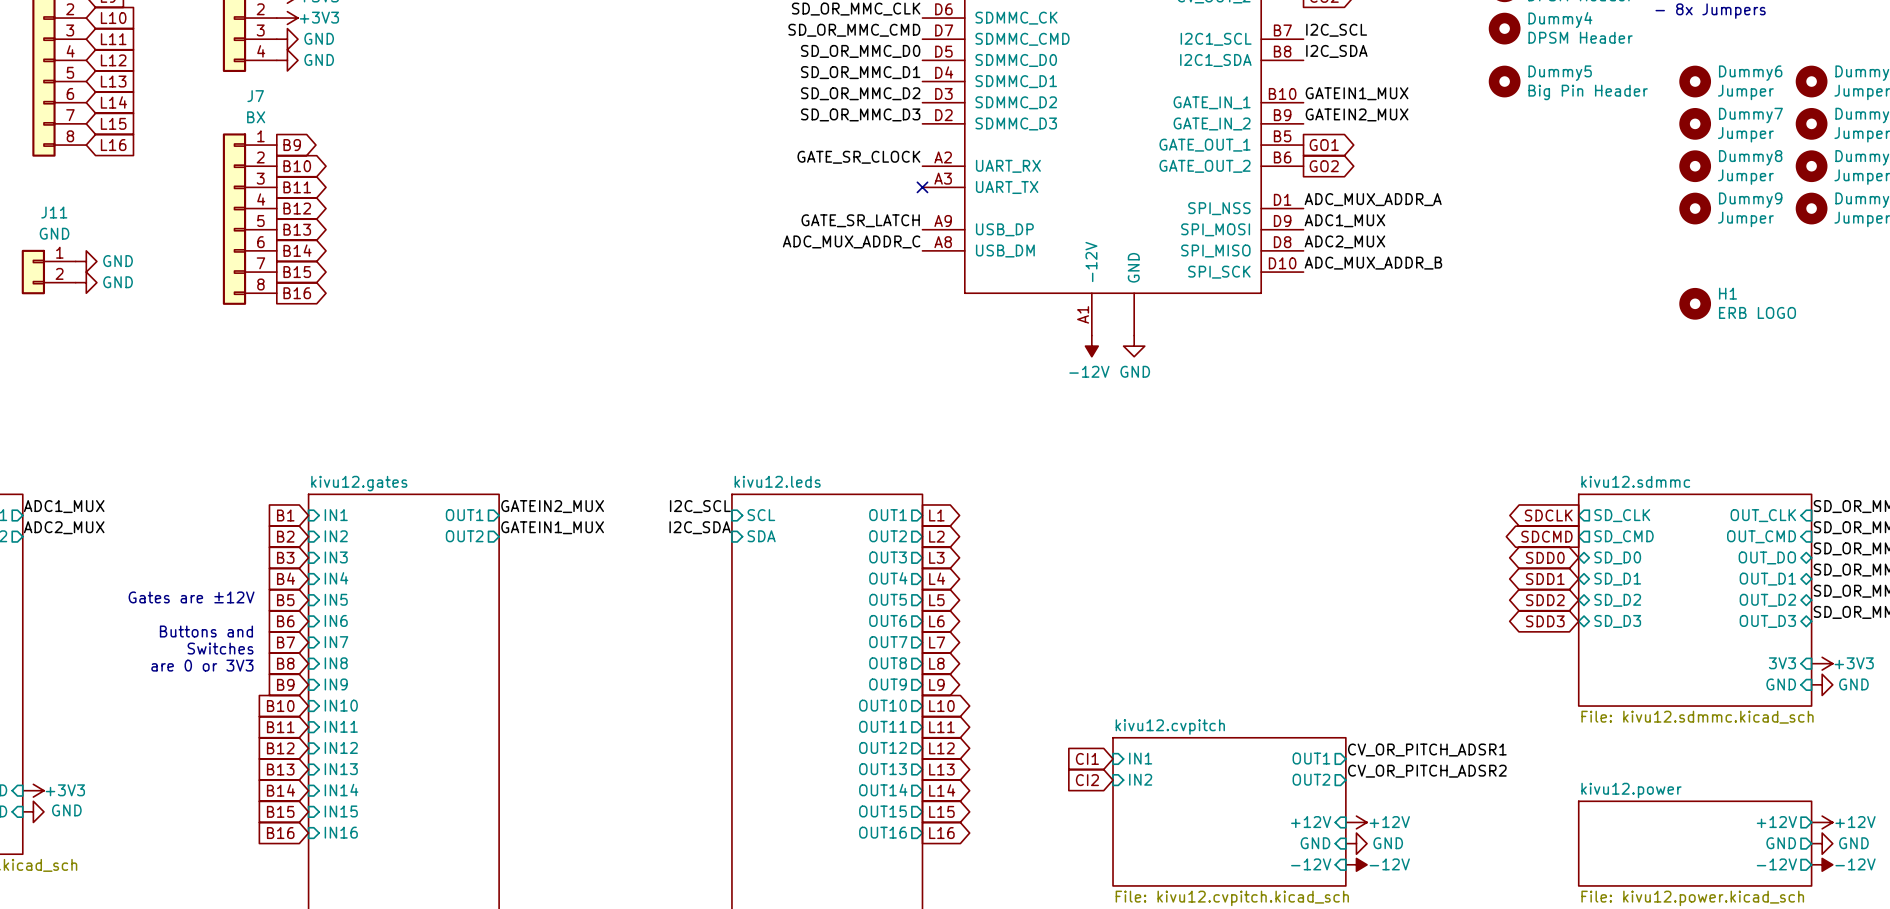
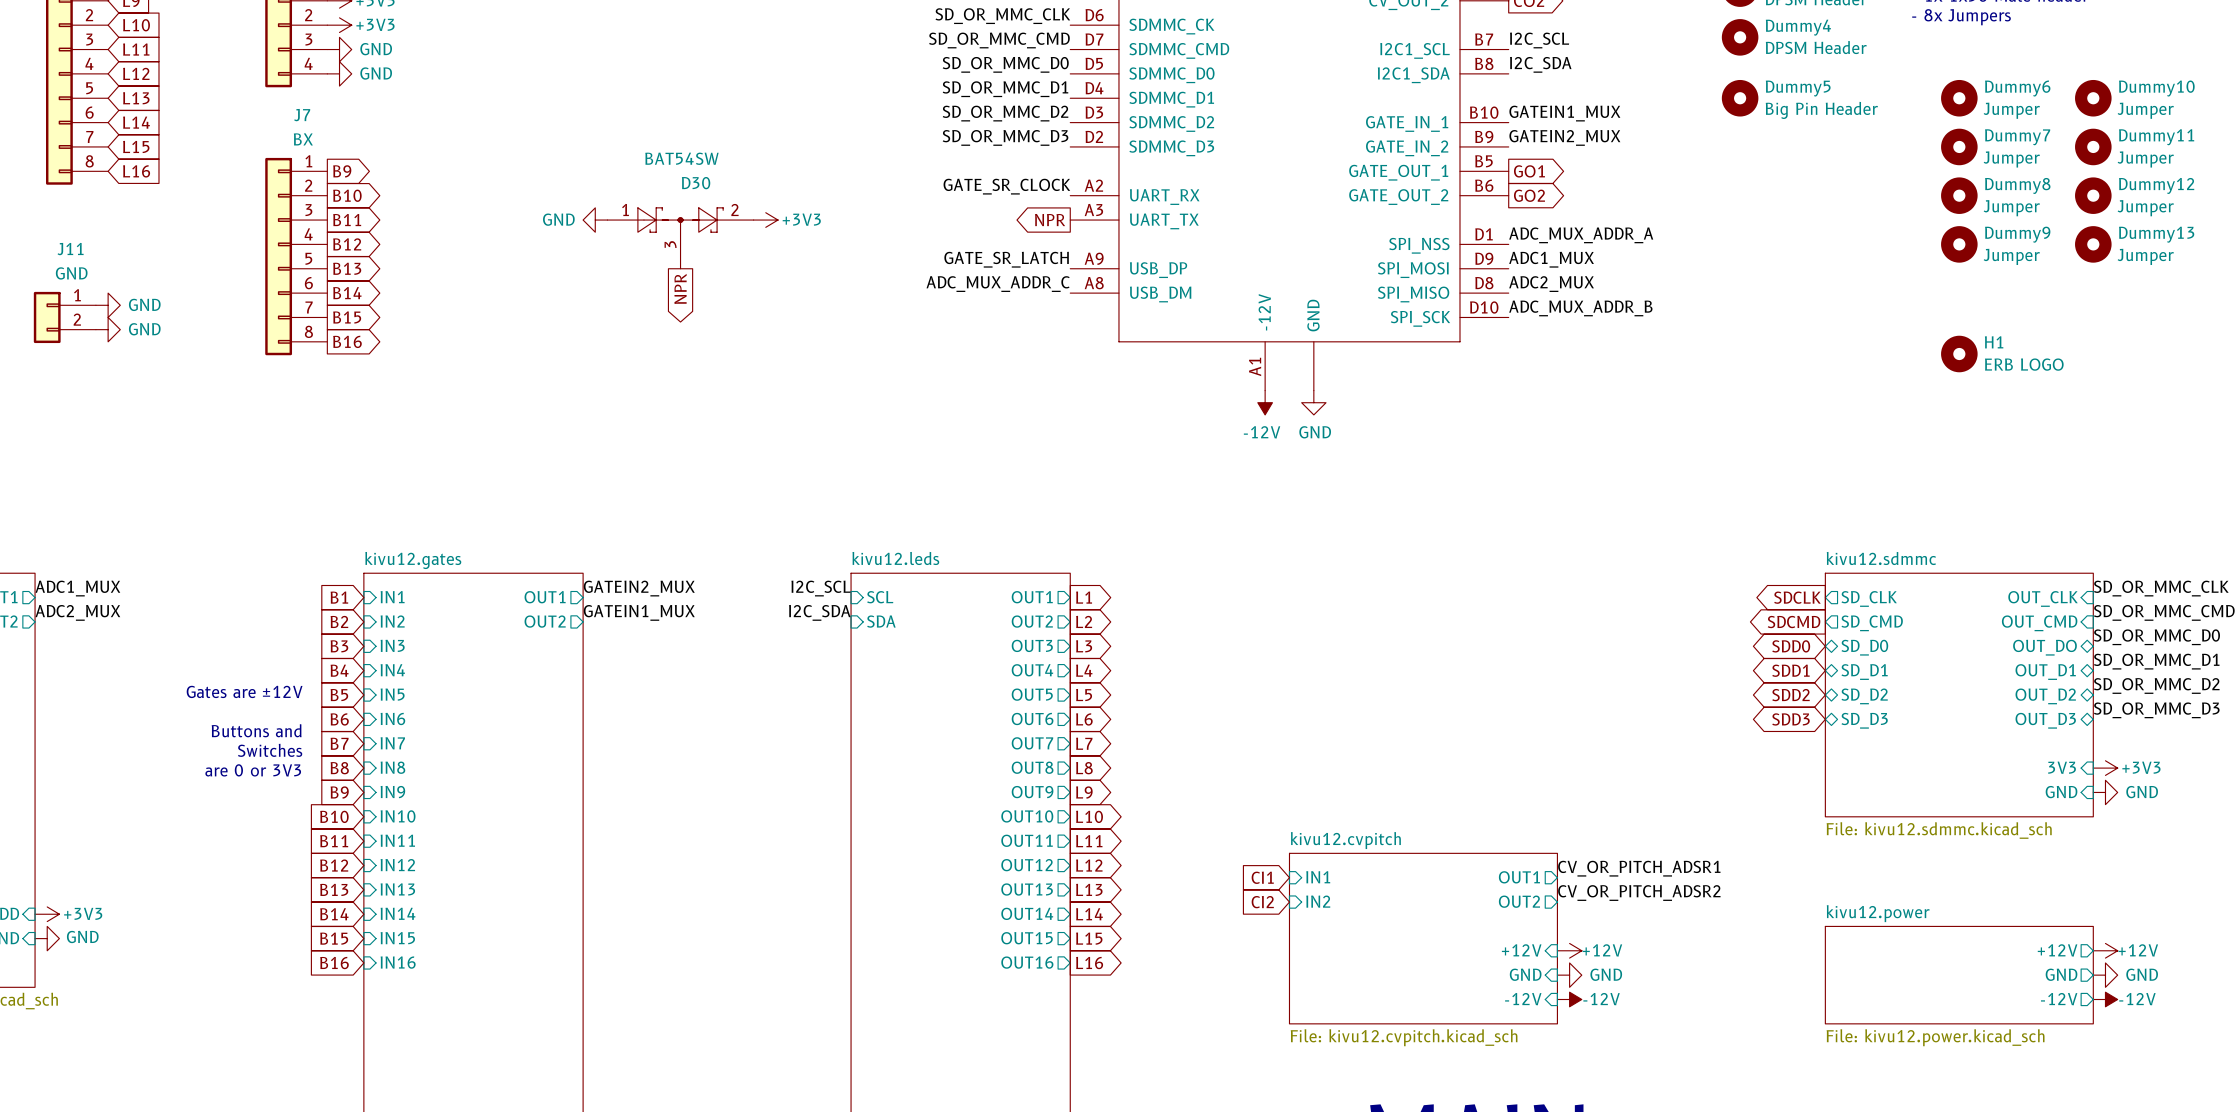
power symbol: none -> GND (595, 220)
power symbol: none -> +3V3 (765, 220)
global label: none -> NPR (1050, 220)
no-connect mark: (922, 187) -> none
D30: none -> BAT54SW (680, 238)
global label: none -> NPR (680, 288)

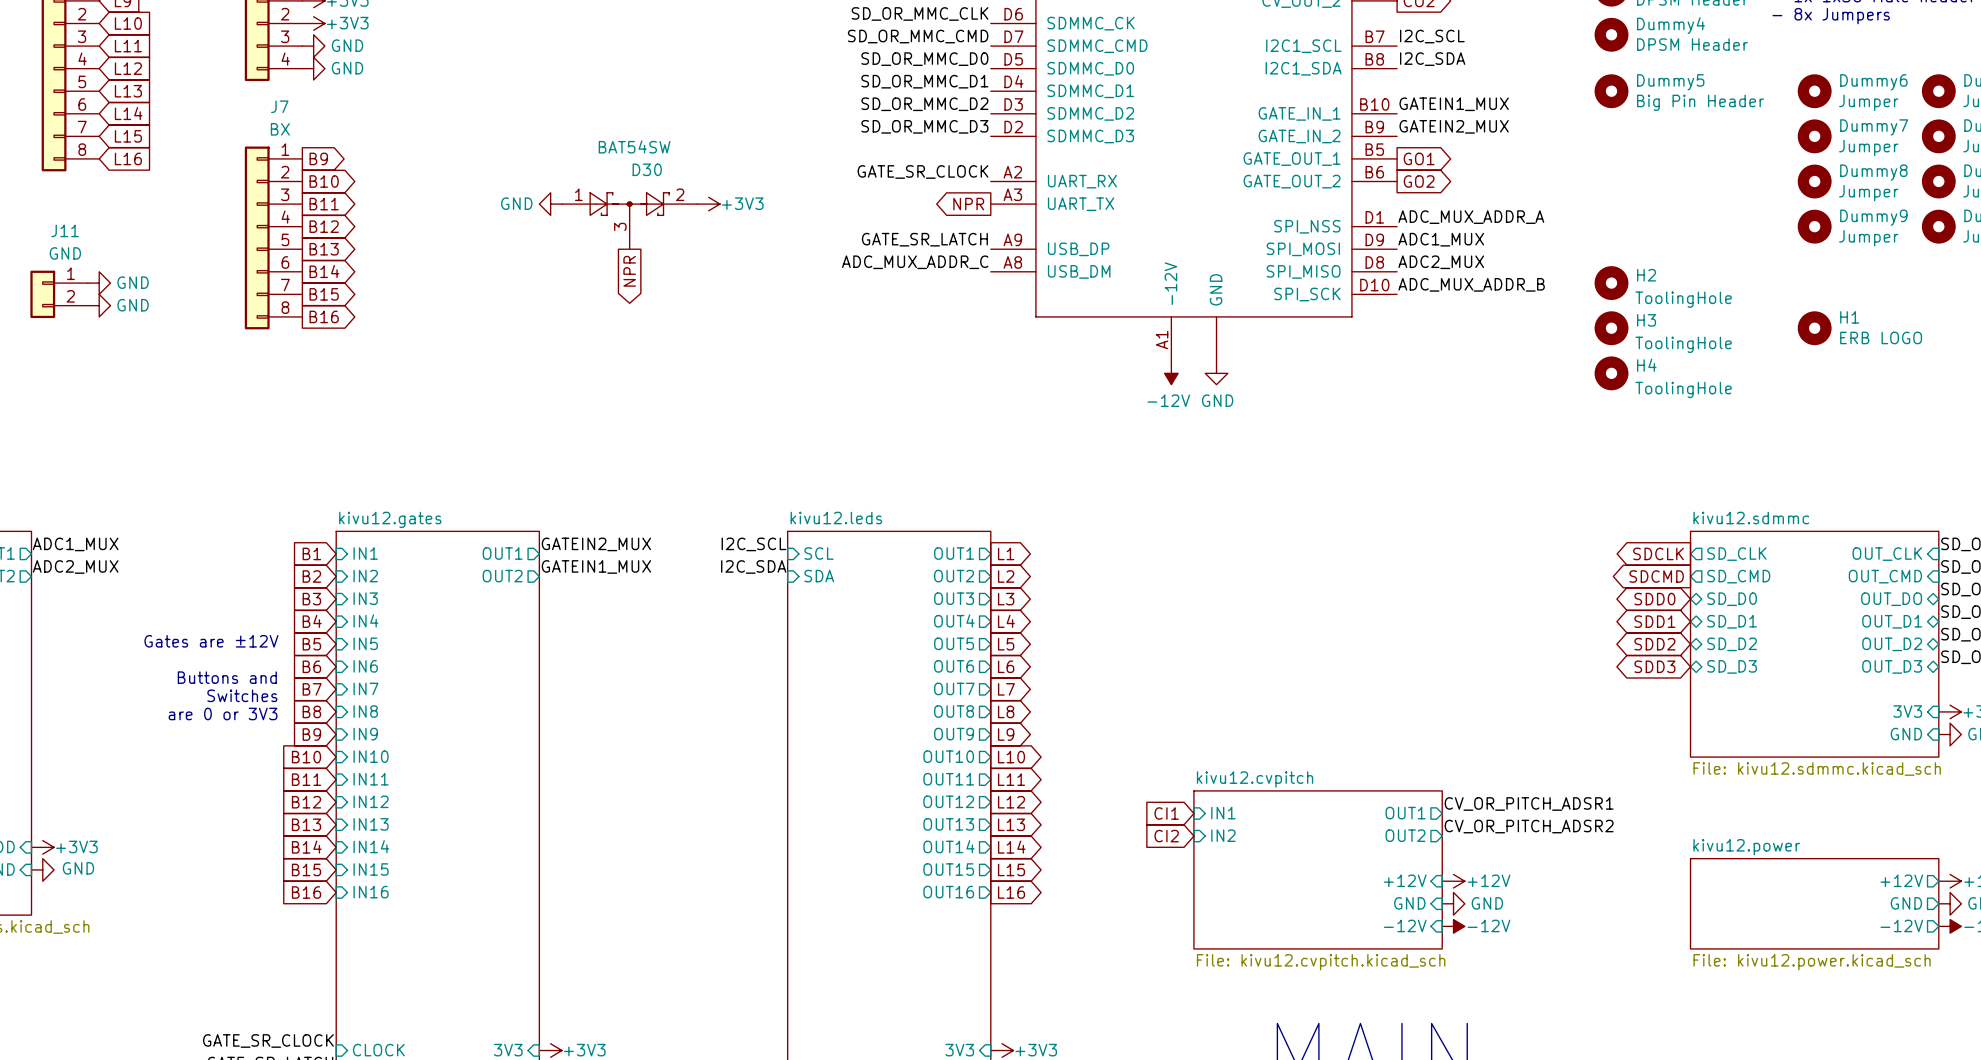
H2: none -> ToolingHole (1611, 283)
H3: none -> ToolingHole (1611, 328)
H4: none -> ToolingHole (1611, 373)

